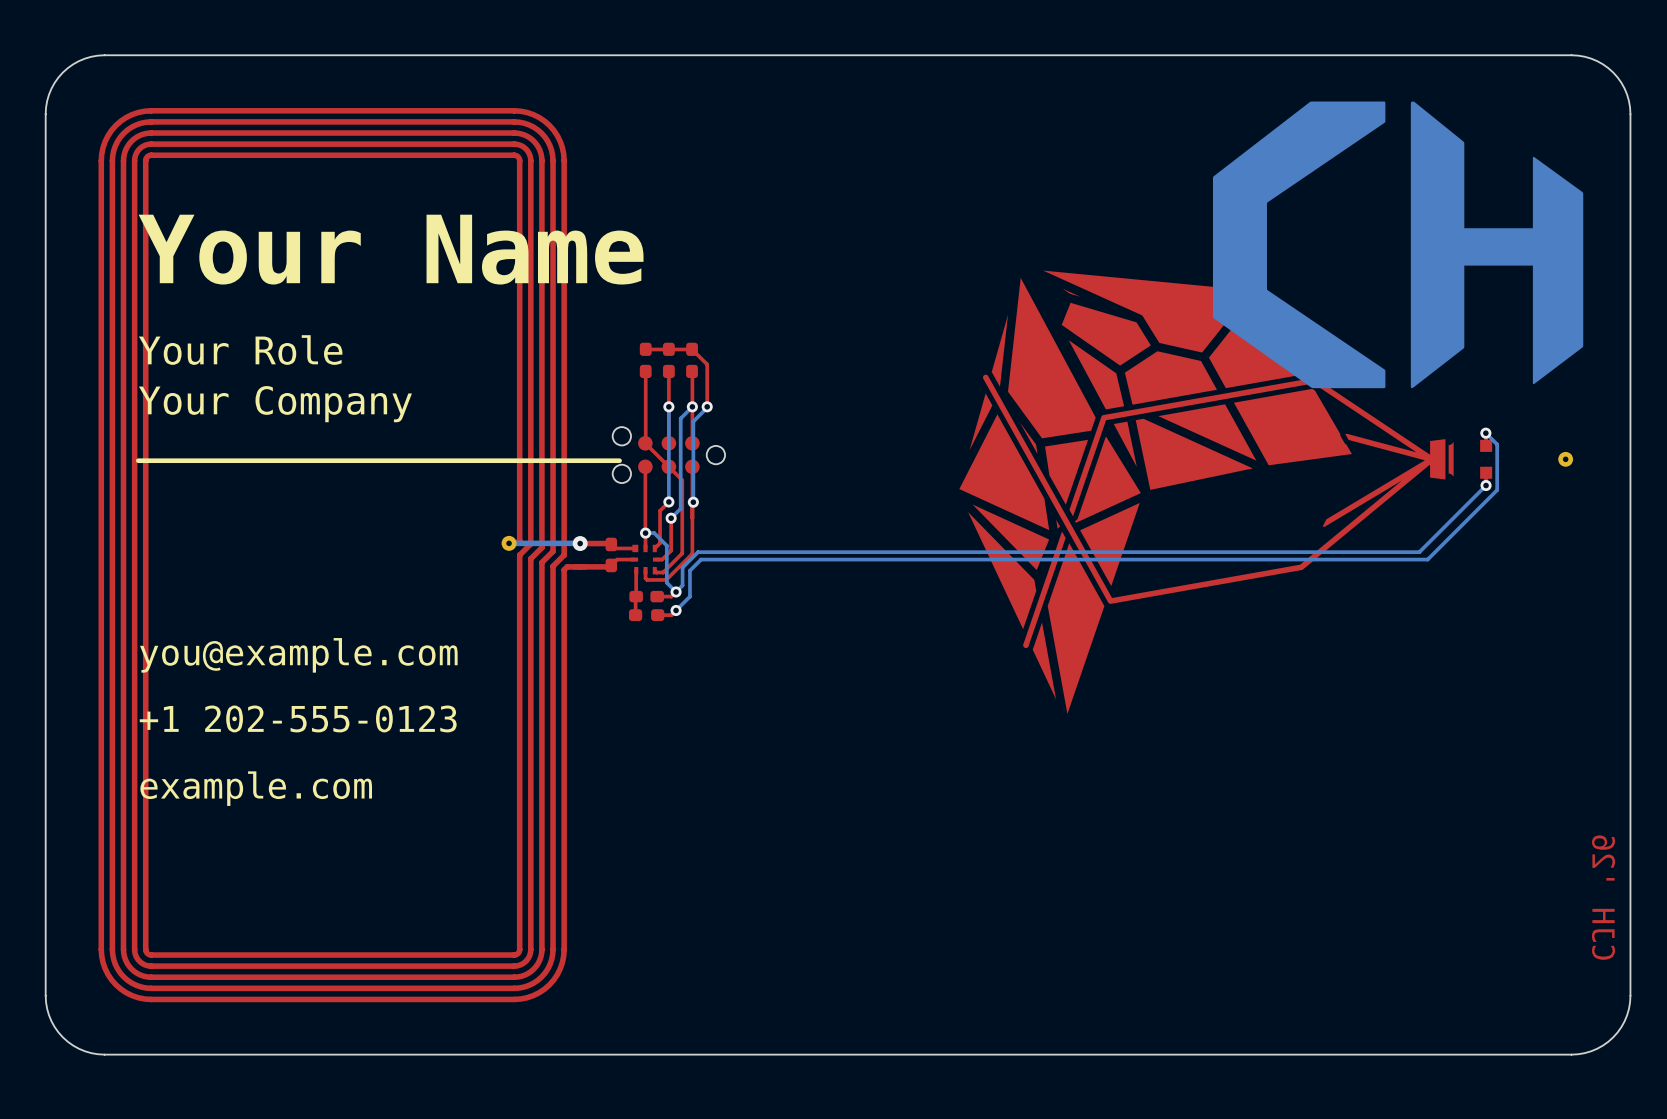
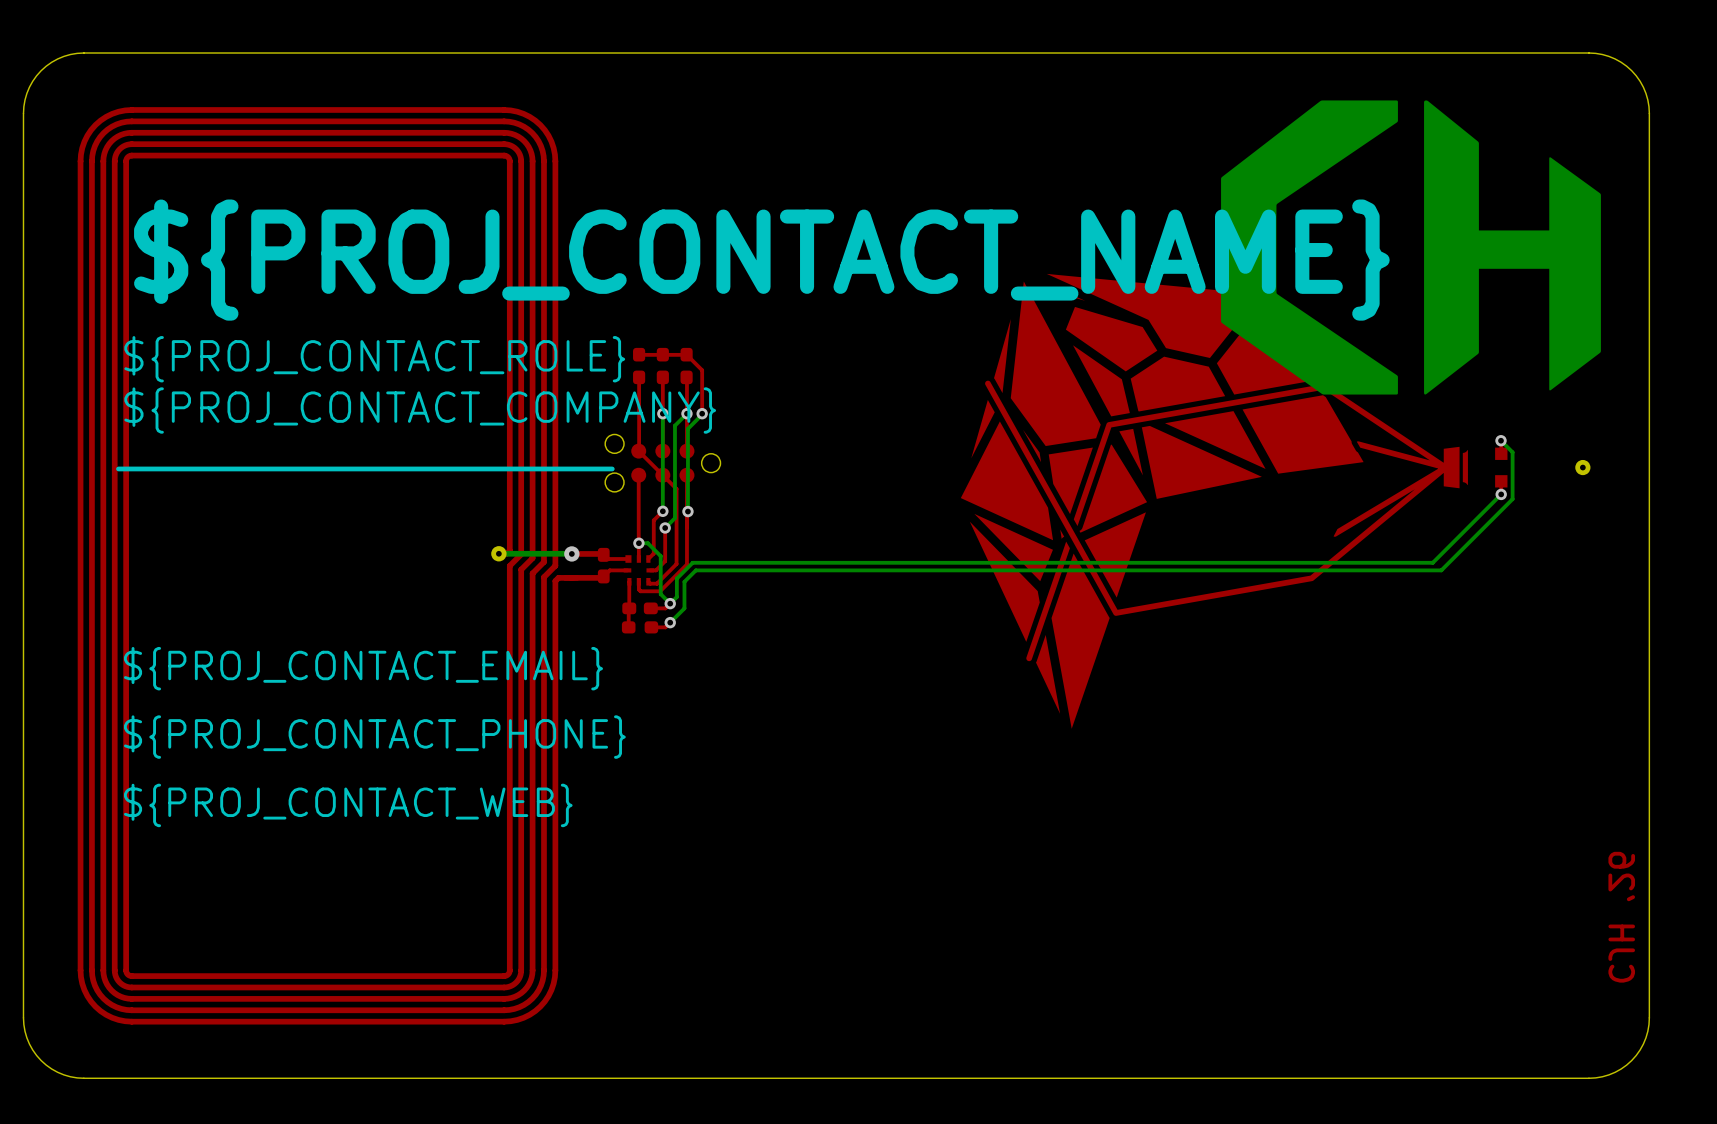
drawing shape: [135, 214, 644, 806] -> [116, 199, 1390, 828]

